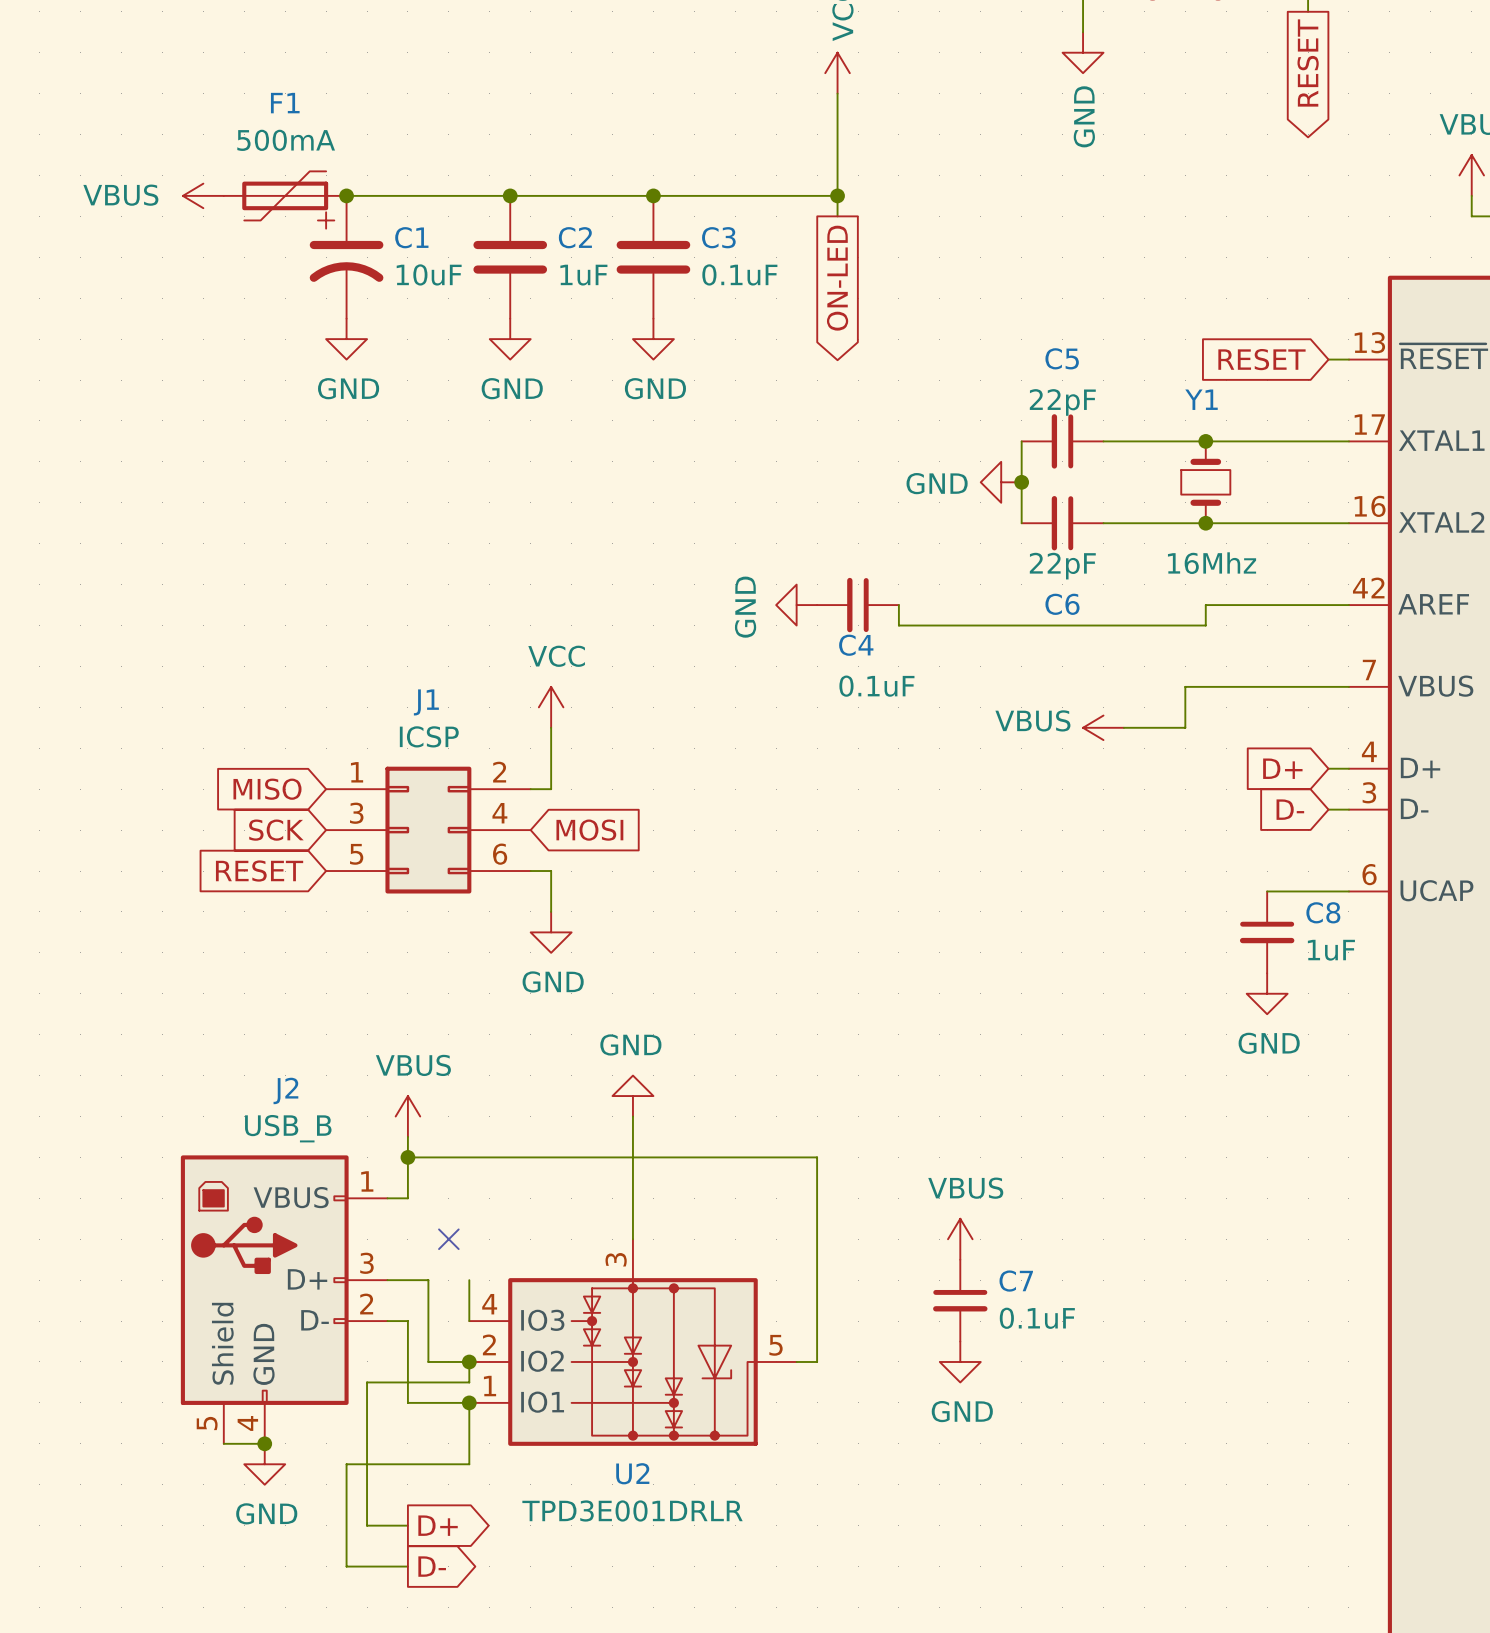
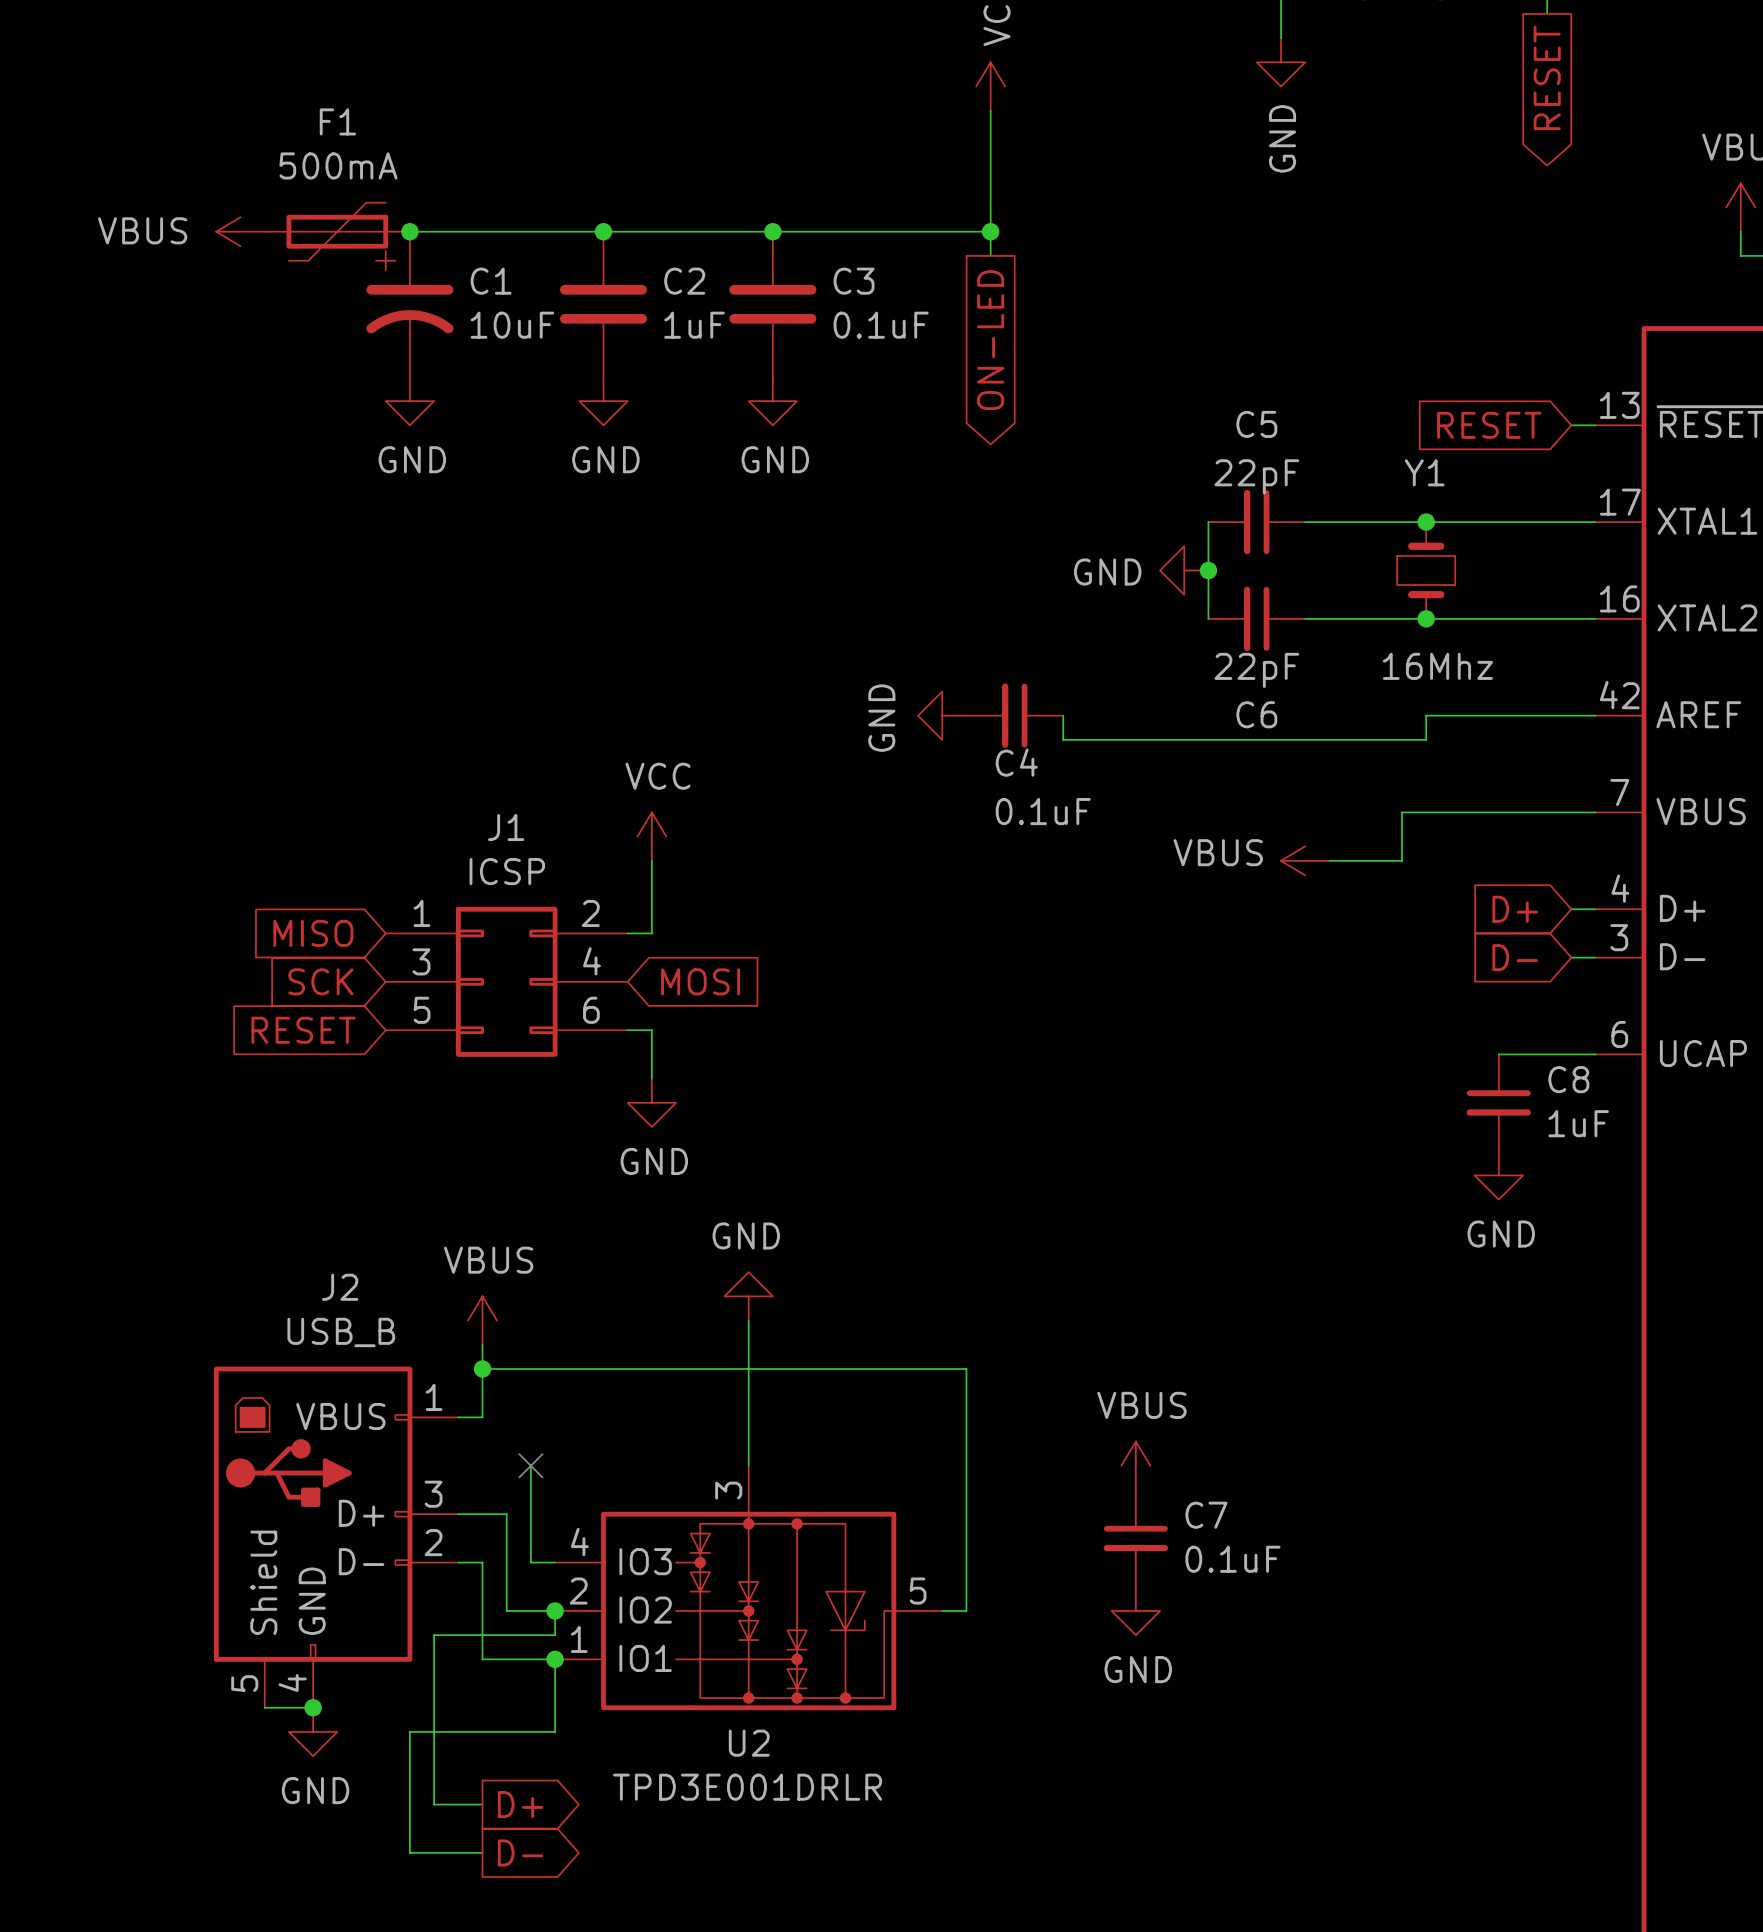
wire: (469, 1280) (469, 1321) -> (530, 1465) (530, 1562) (555, 1562)

